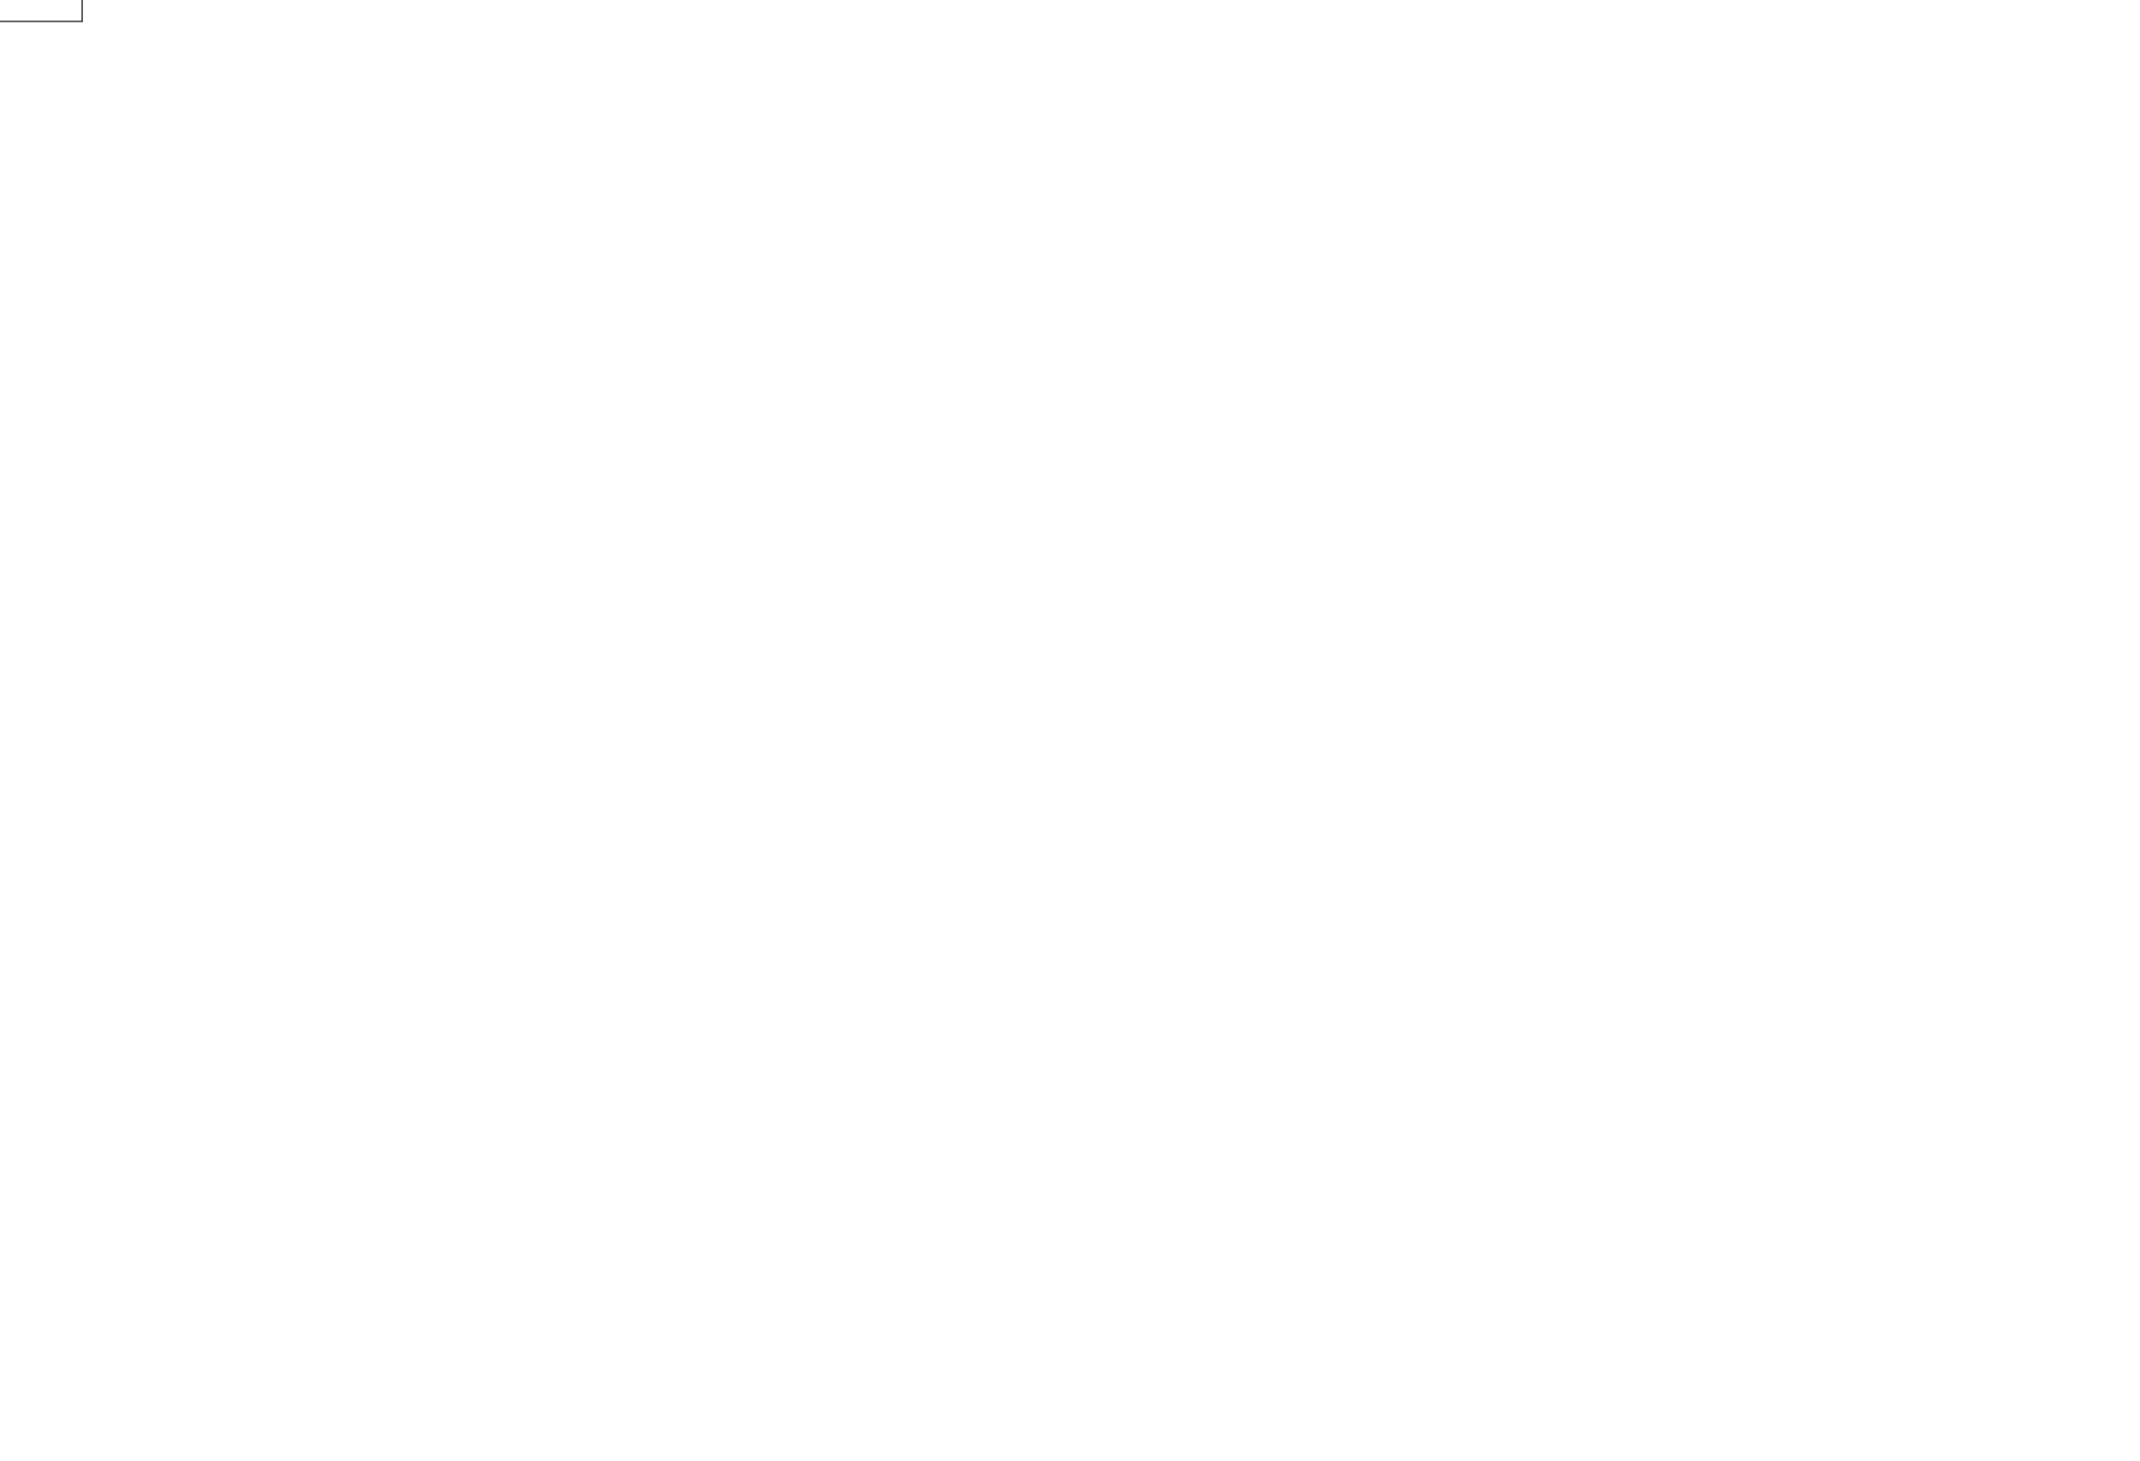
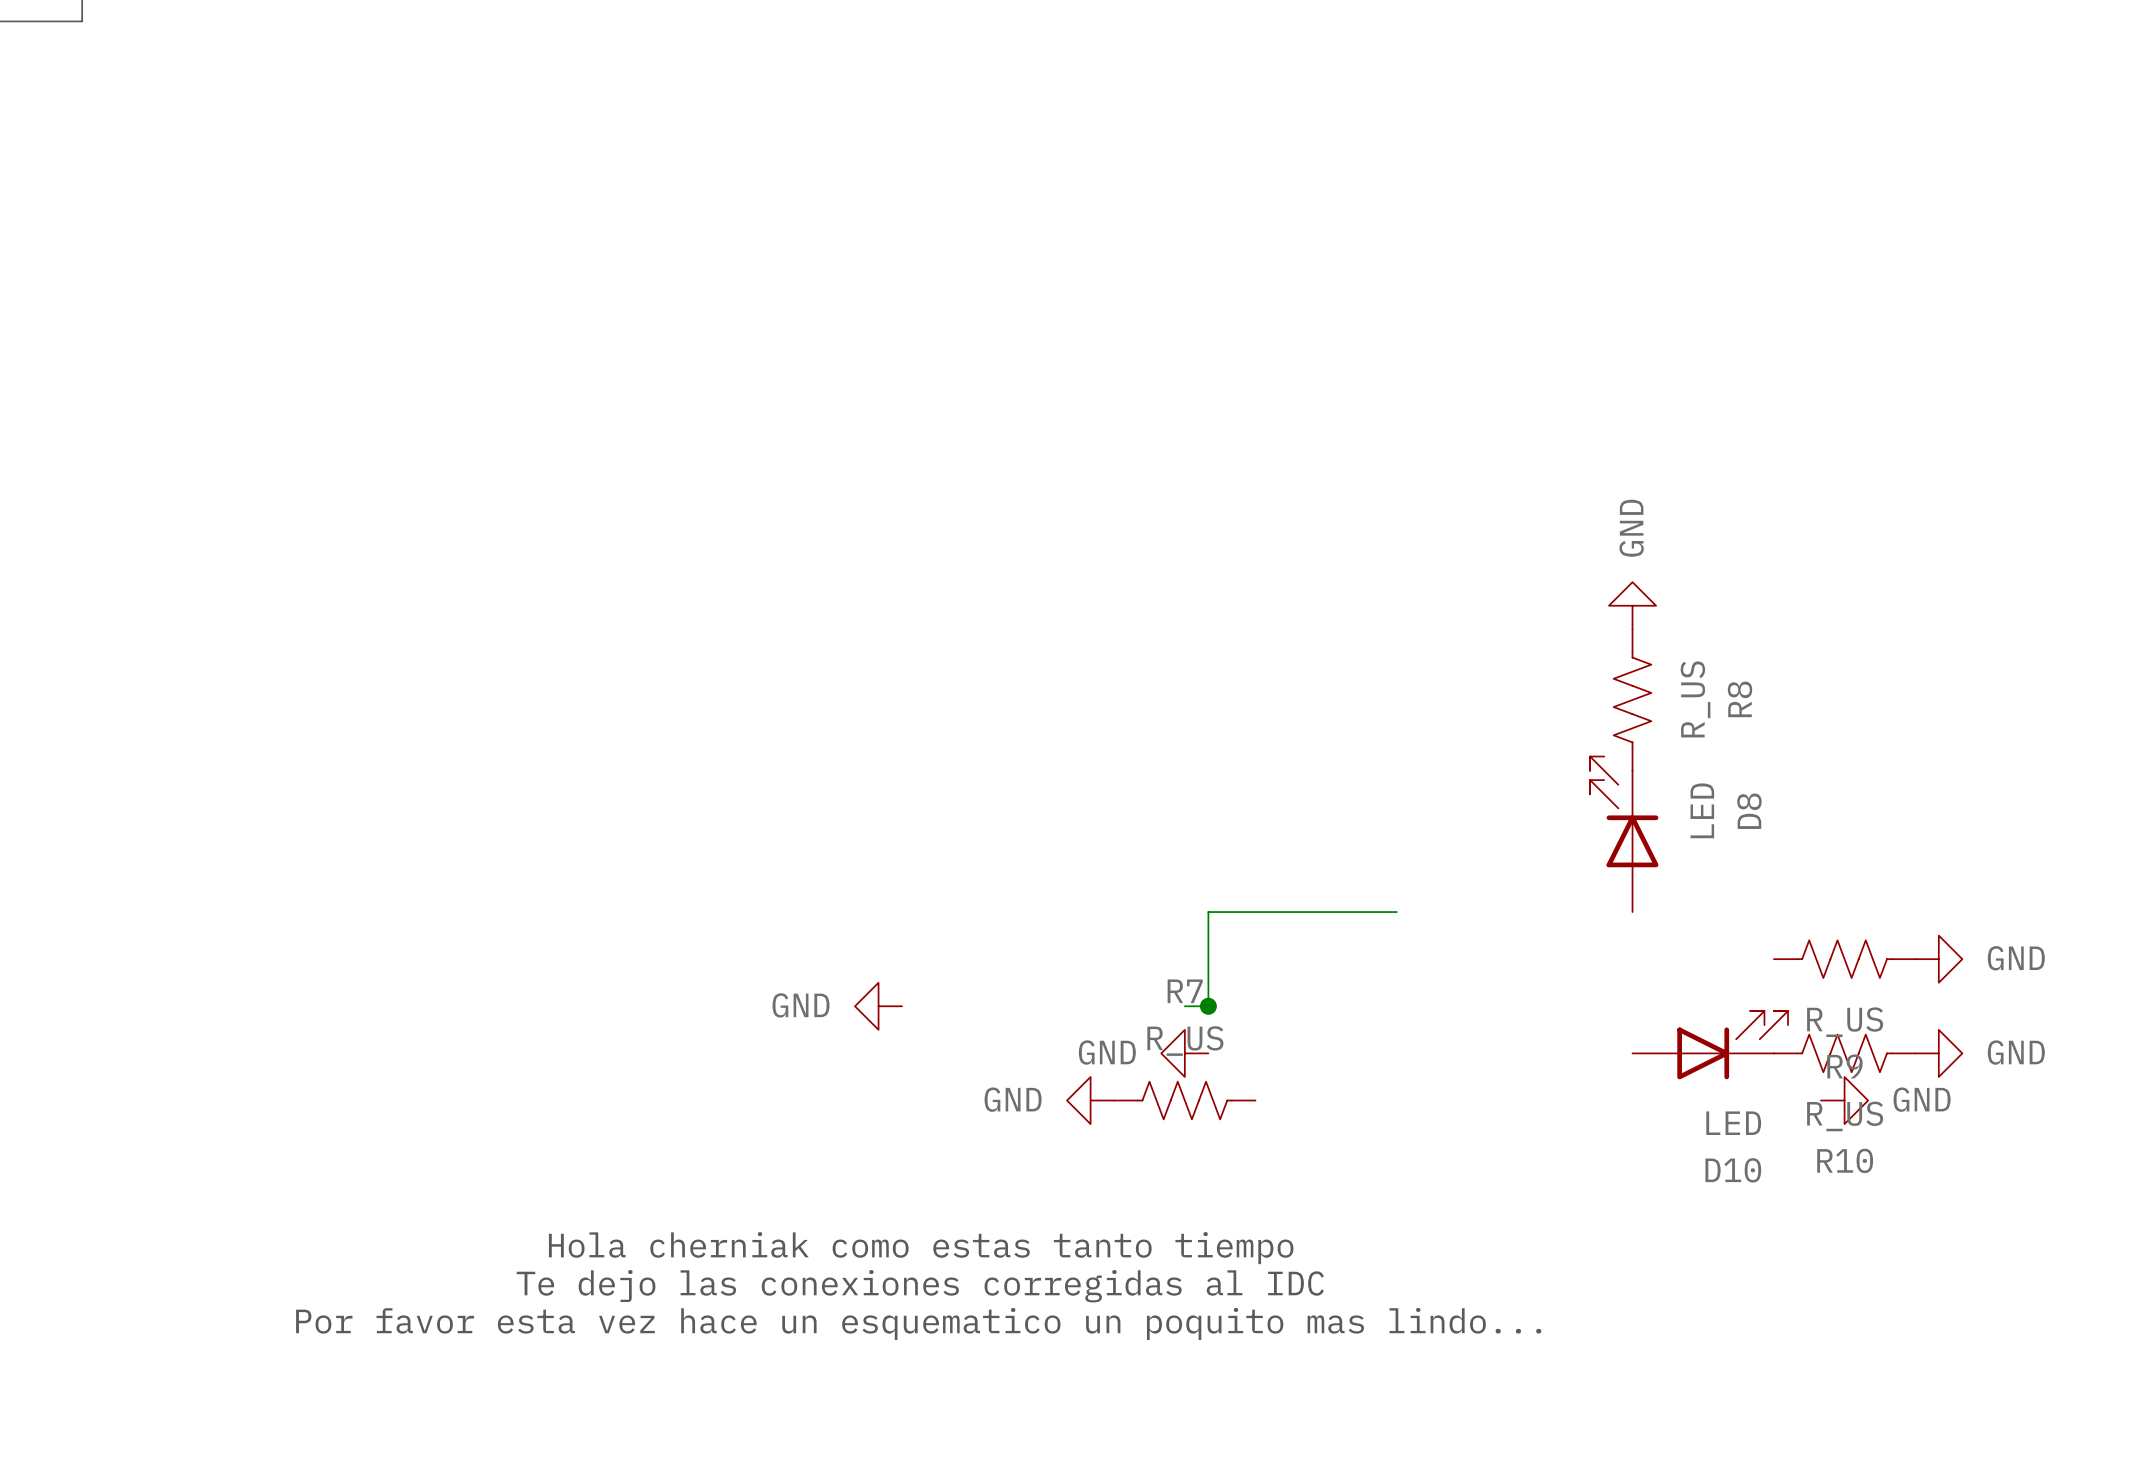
power symbol: none -> GND (1632, 605)
R8: none -> R_US (1632, 699)
D8: none -> LED (1624, 834)
wire: none -> (1396, 912) (1208, 912) (1208, 1006) (1184, 1006)
R9: none -> R_US (1844, 959)
power symbol: none -> GND (1938, 959)
power symbol: none -> GND (878, 1006)
junction: none -> (1208, 1006)
D10: none -> LED (1710, 1045)
power symbol: none -> GND (1184, 1053)
R10: none -> R_US (1844, 1053)
power symbol: none -> GND (1938, 1053)
power symbol: none -> GND (1090, 1100)
R7: none -> R_US (1184, 1100)
power symbol: none -> GND (1844, 1100)
text: none -> Hola cherniak como estas tanto tiempo (921, 1248)
text: none -> Te dejo las conexiones corregidas al IDC (920, 1286)
text: none -> Por favor esta vez hace un esquematico un poquito mas lindo... (918, 1323)

